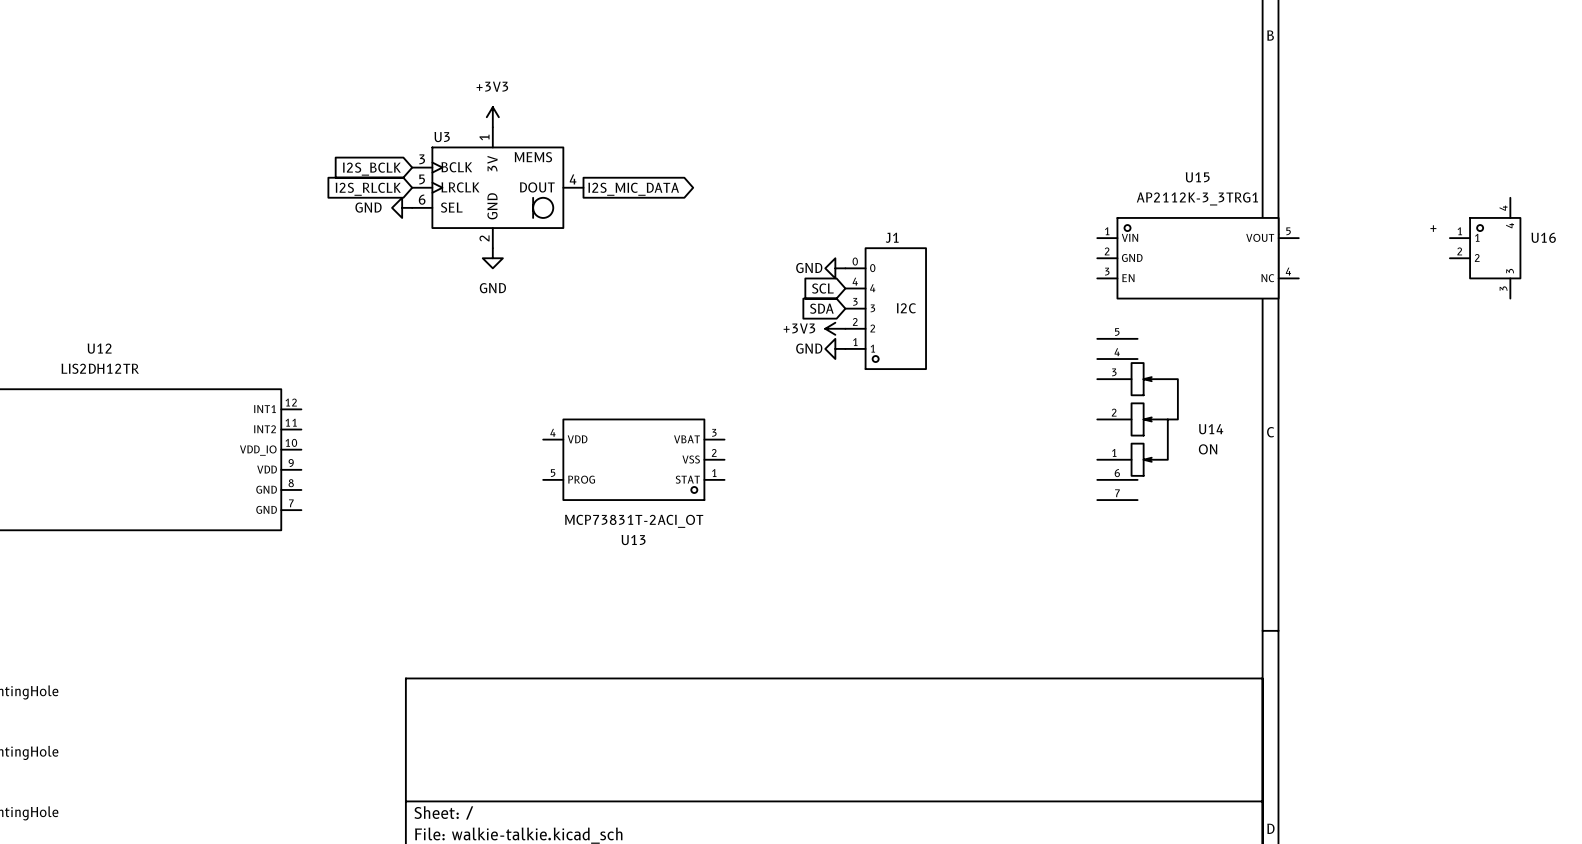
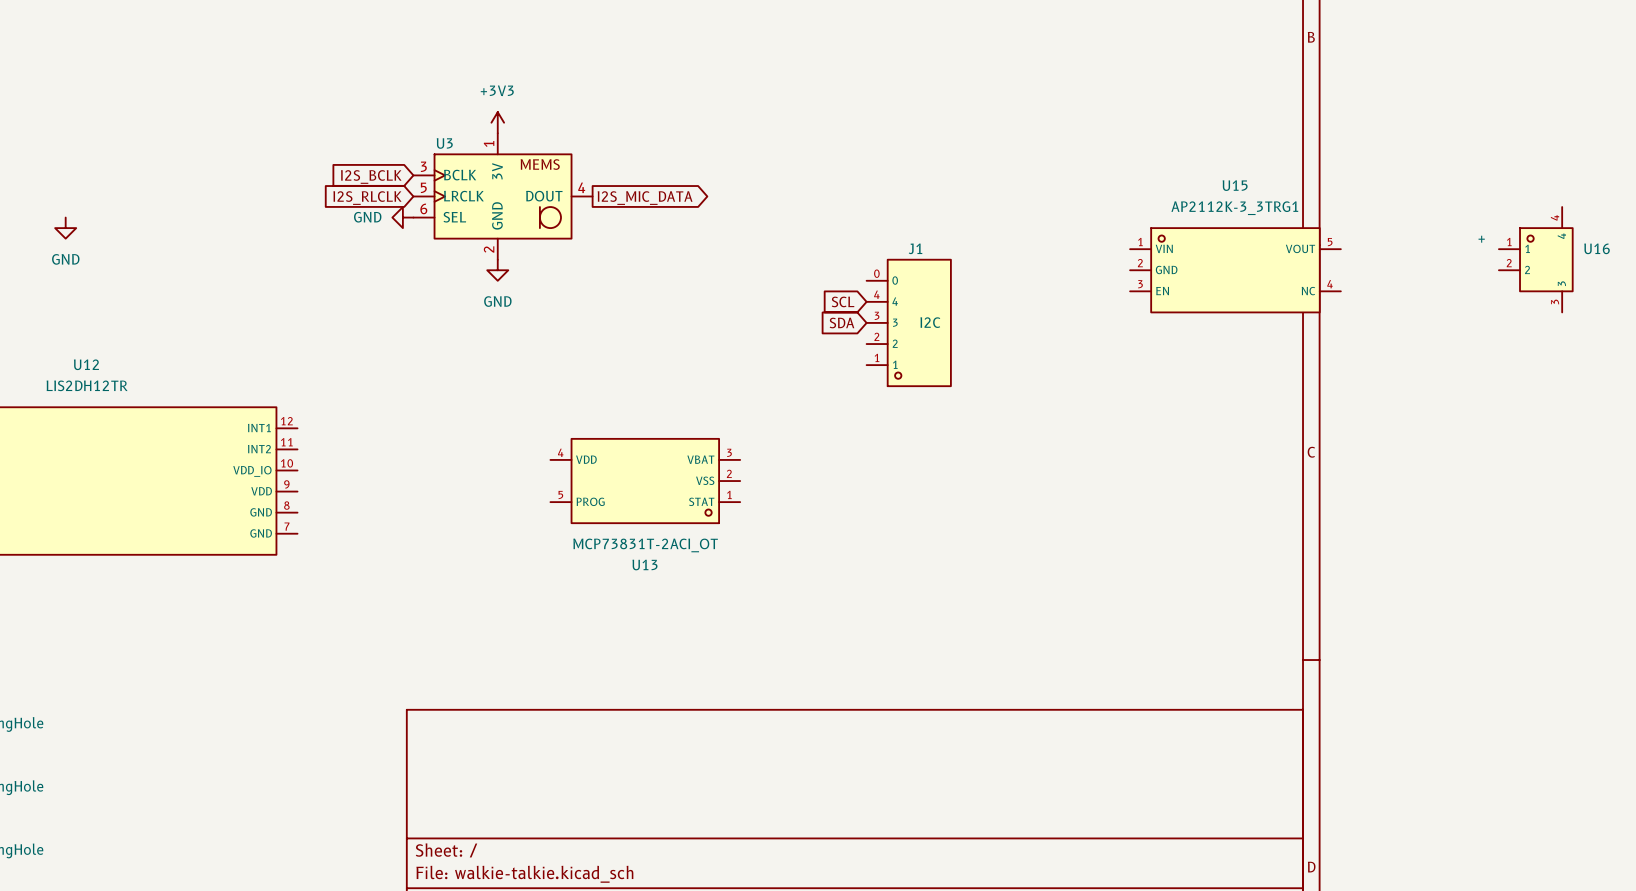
power symbol: none -> GND (65, 228)
power symbol: GND (835, 268) -> none
power symbol: +3V3 (835, 328) -> none
power symbol: GND (835, 348) -> none
U14: ON (1137, 419) -> none

